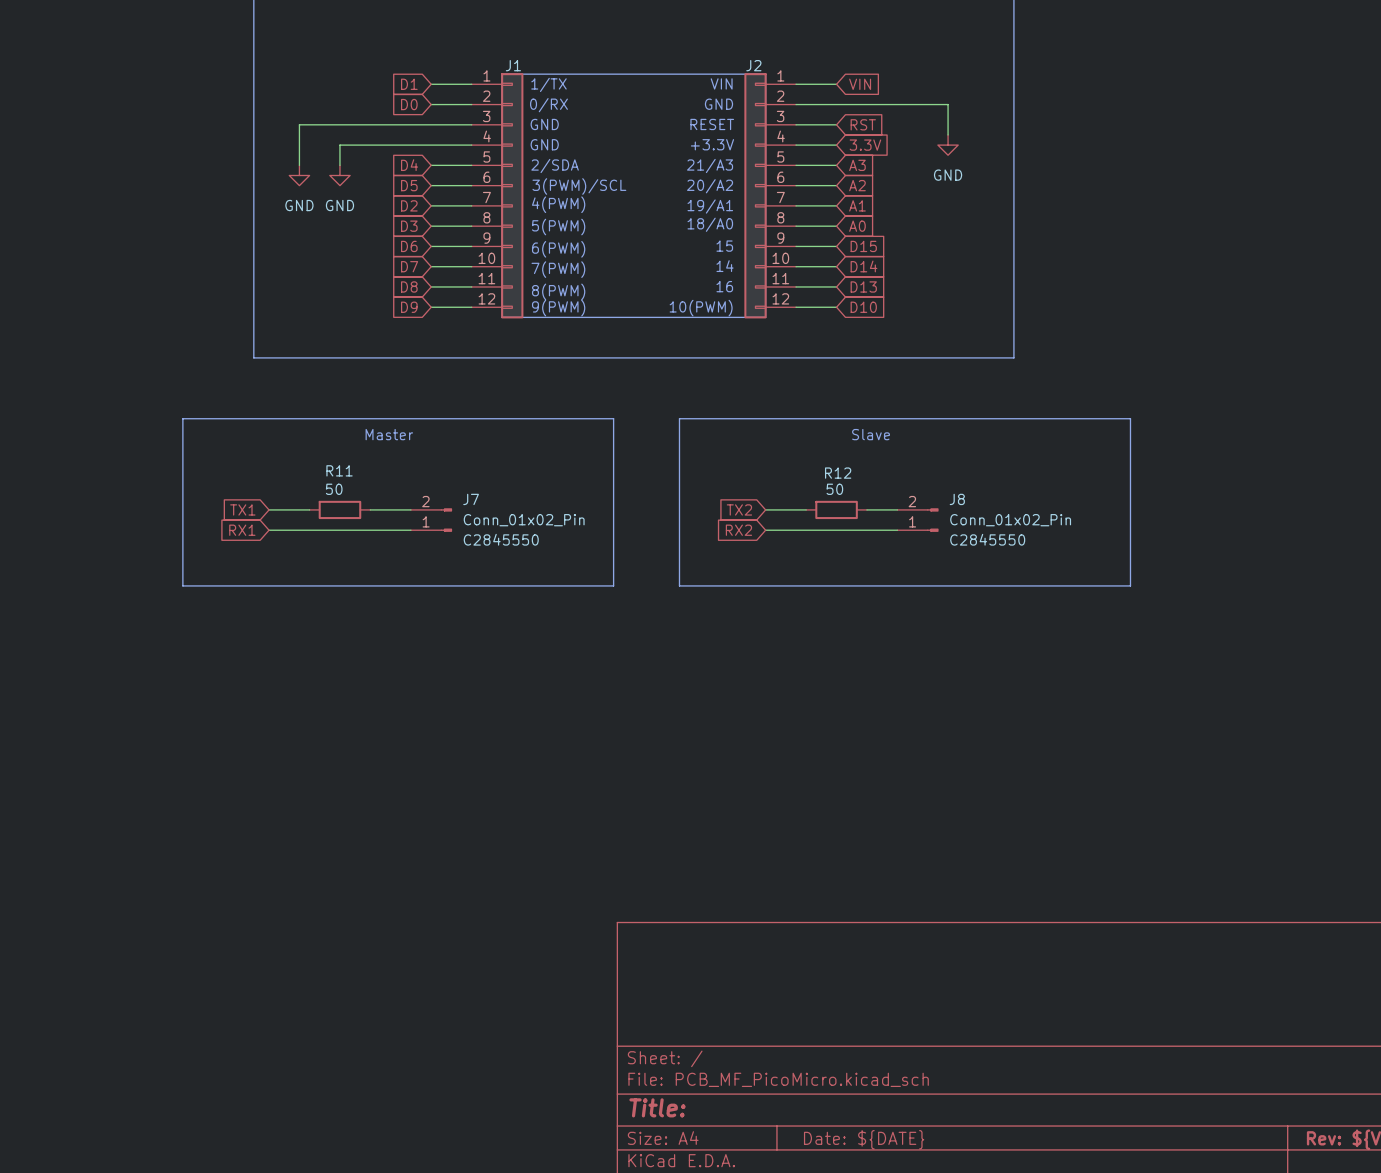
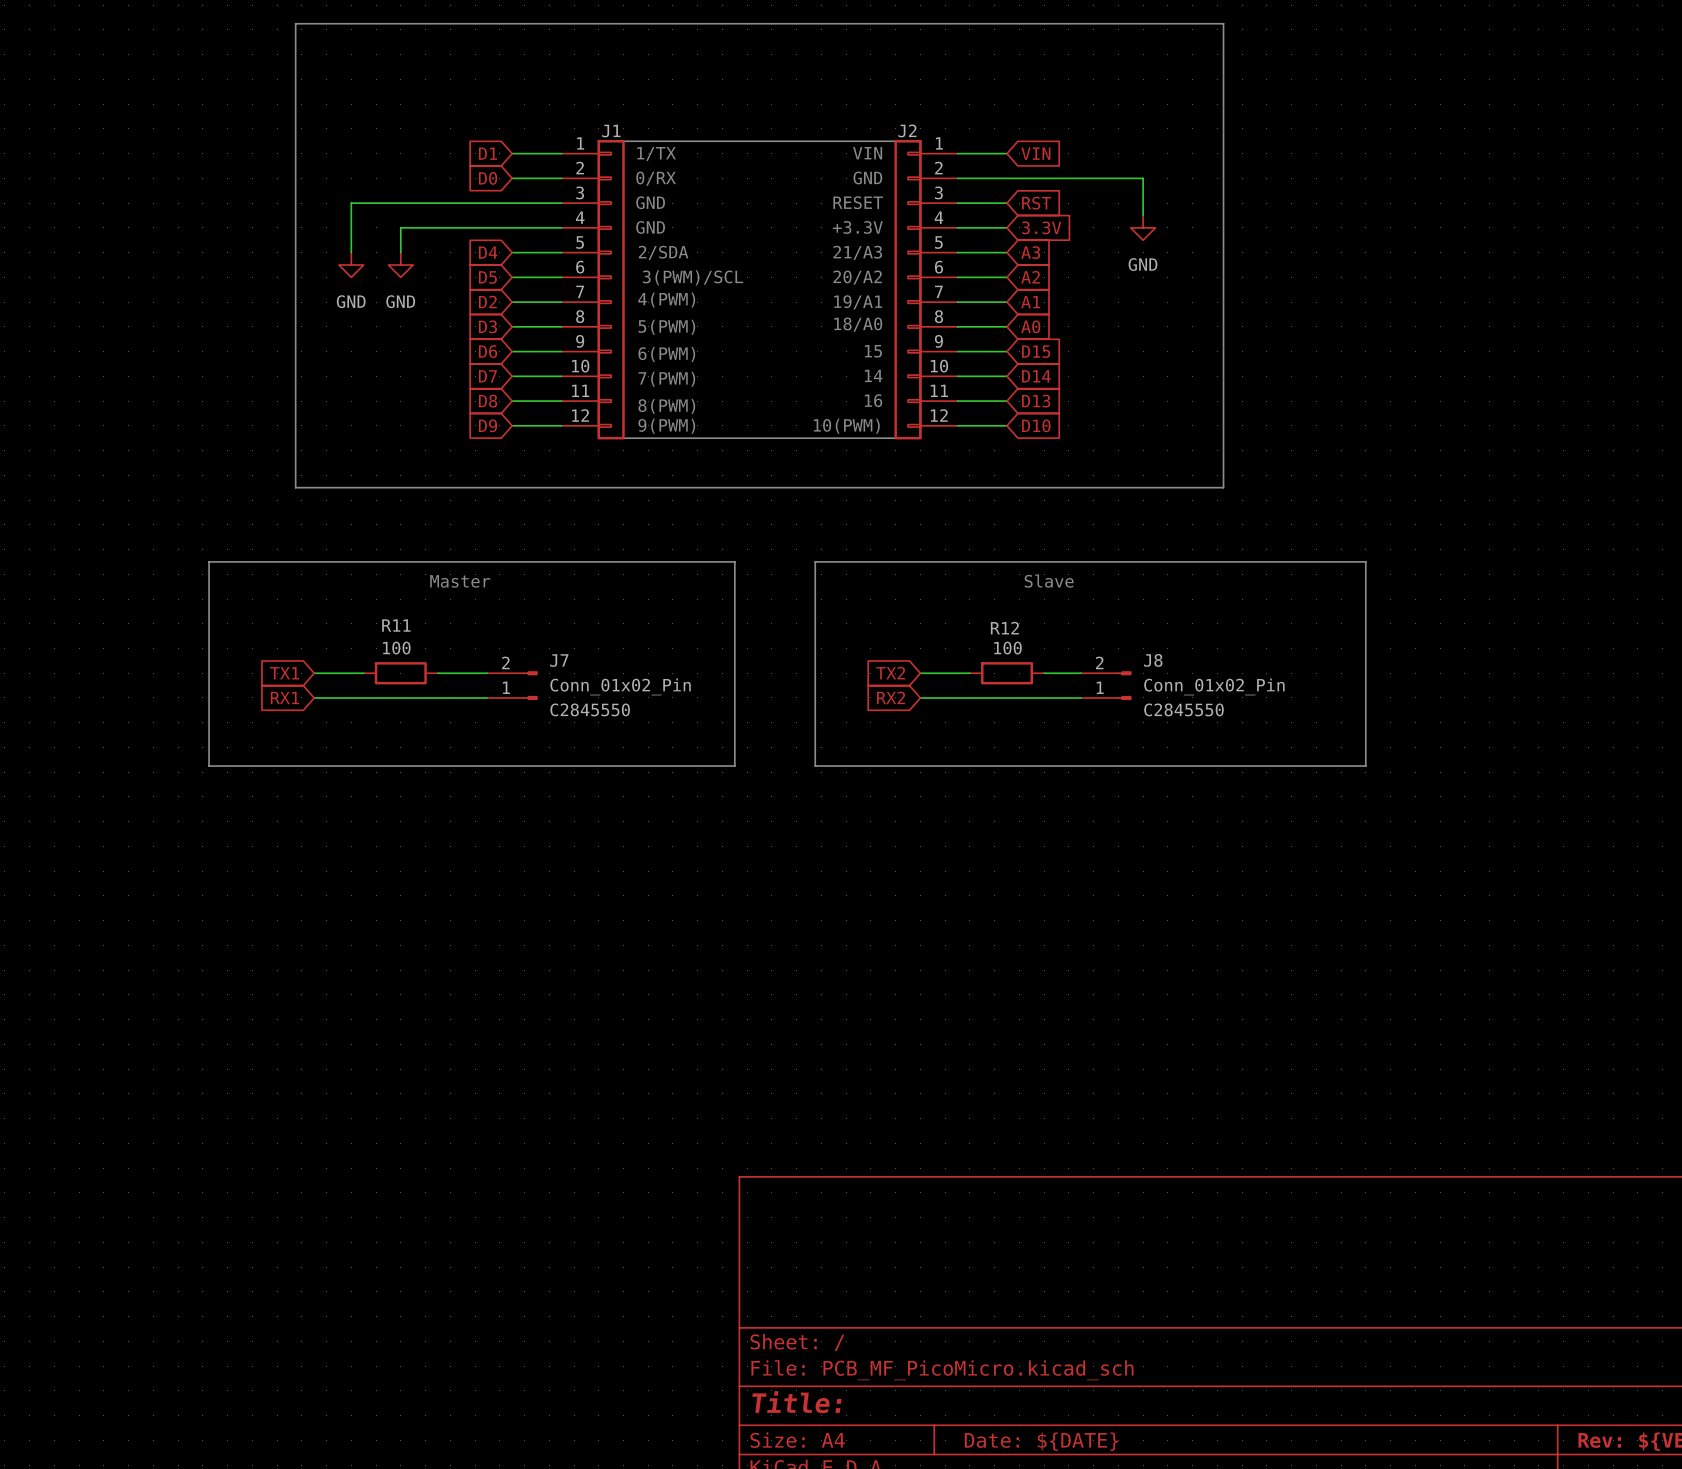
R11 value: 50 (334, 489) -> 100 (396, 648)
R12 value: 50 (834, 489) -> 100 (1007, 648)

